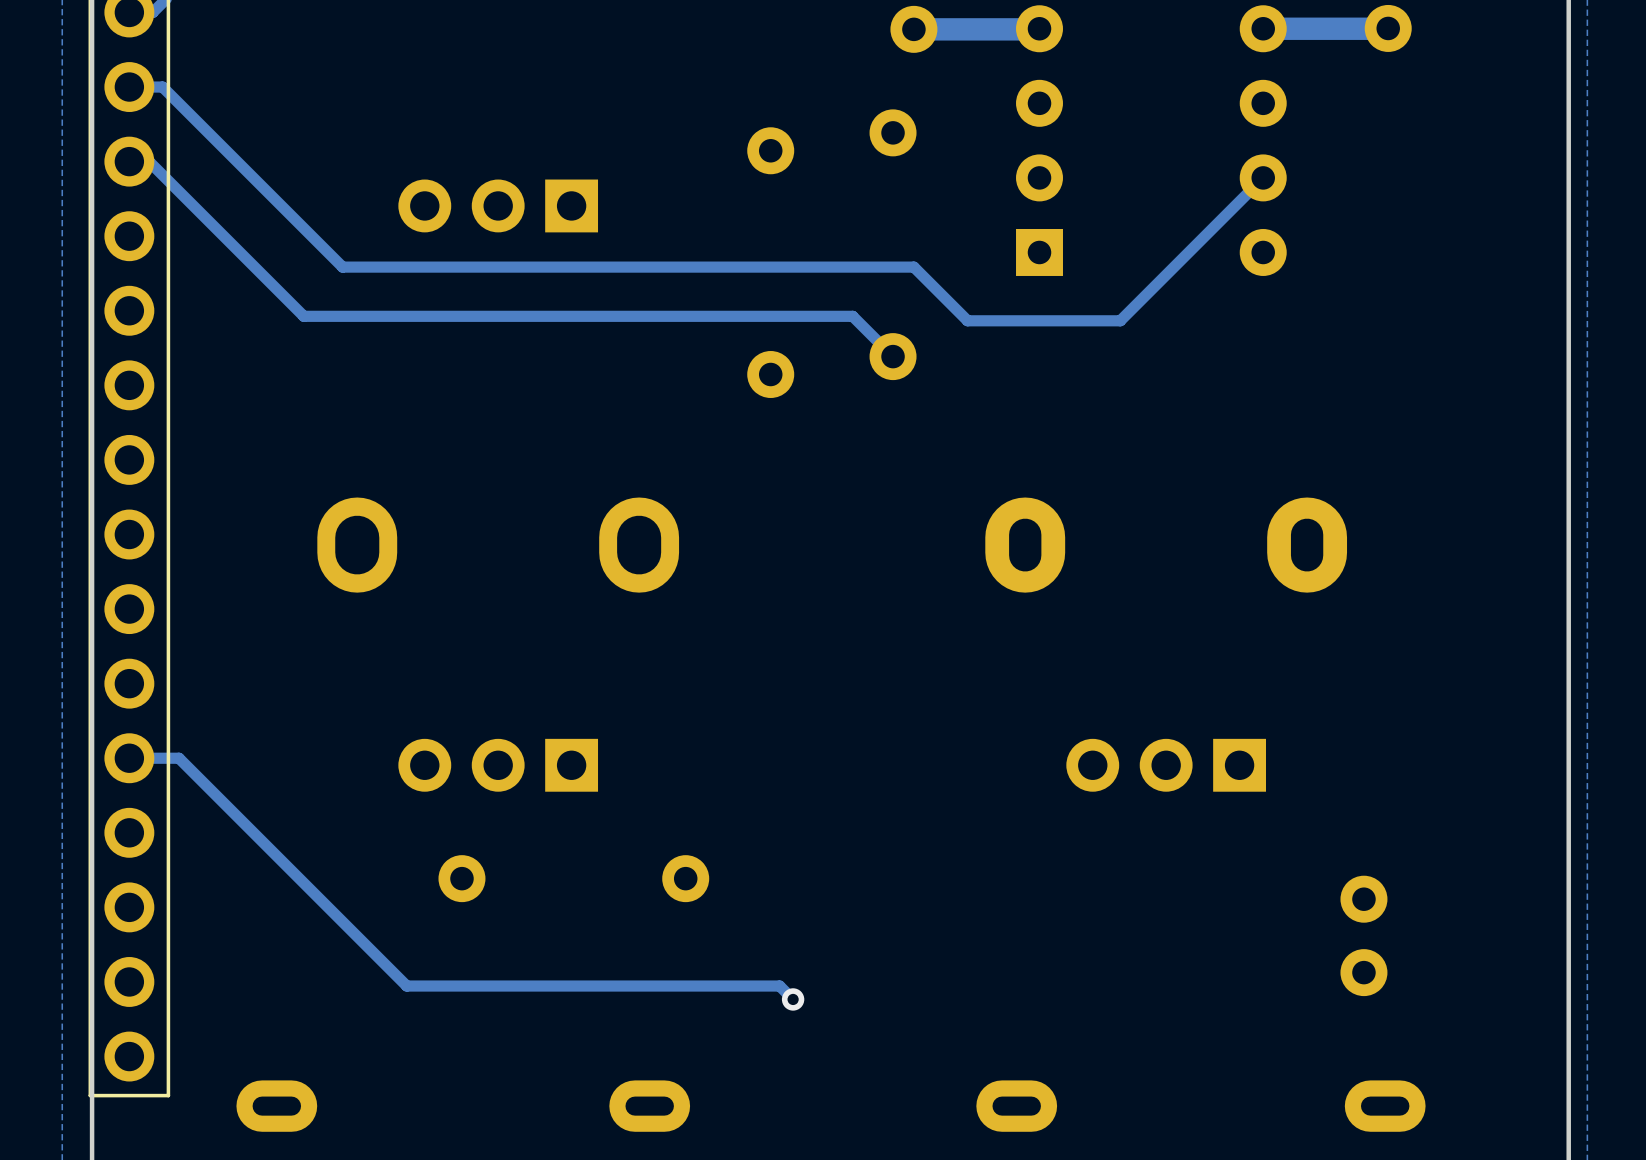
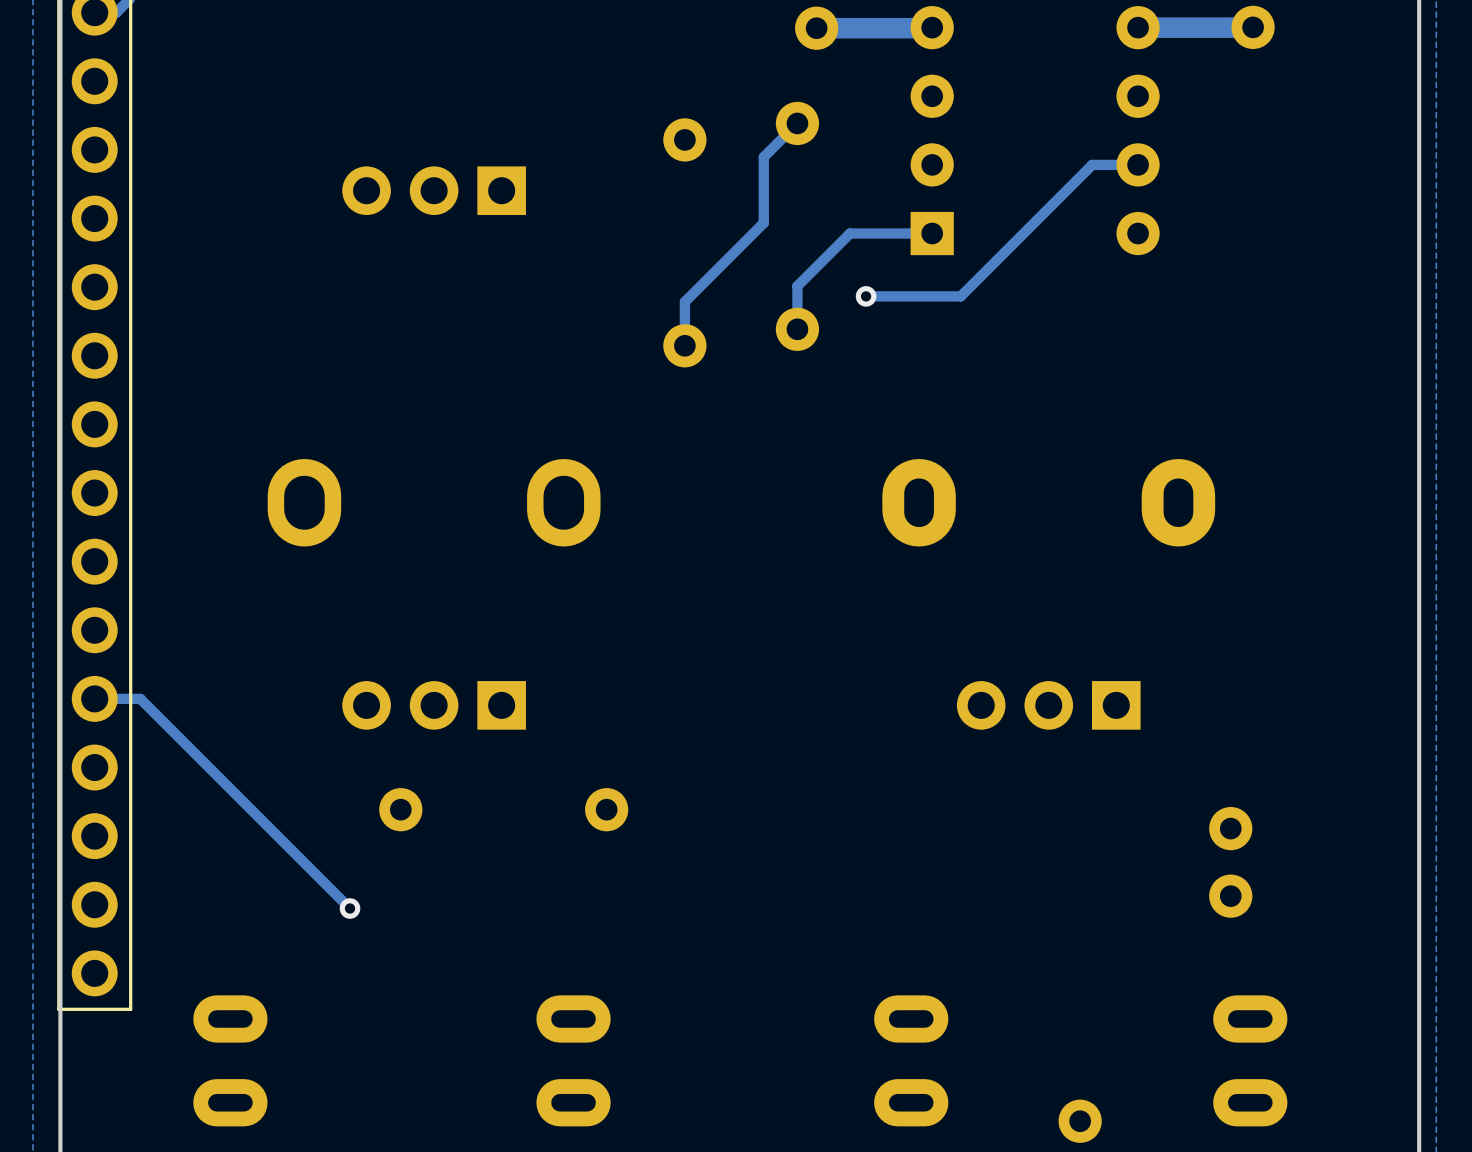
track: (129, 87) (162, 87) (342, 267) (913, 267) (967, 320) -> none
track: none -> (797, 123) (763, 157) (763, 222) (684, 301) (684, 345)
track: (129, 161) (149, 161) (303, 316) (852, 316) (893, 356) -> (932, 233) (850, 233) (797, 286) (797, 329)
track: (1263, 177) (1120, 320) (1070, 320) -> (1138, 164) (1092, 164) (960, 296)
via: none -> (866, 296)
track: (406, 986) (779, 986) (793, 999) -> none
via: none -> (350, 908)
via: (793, 999) -> none

